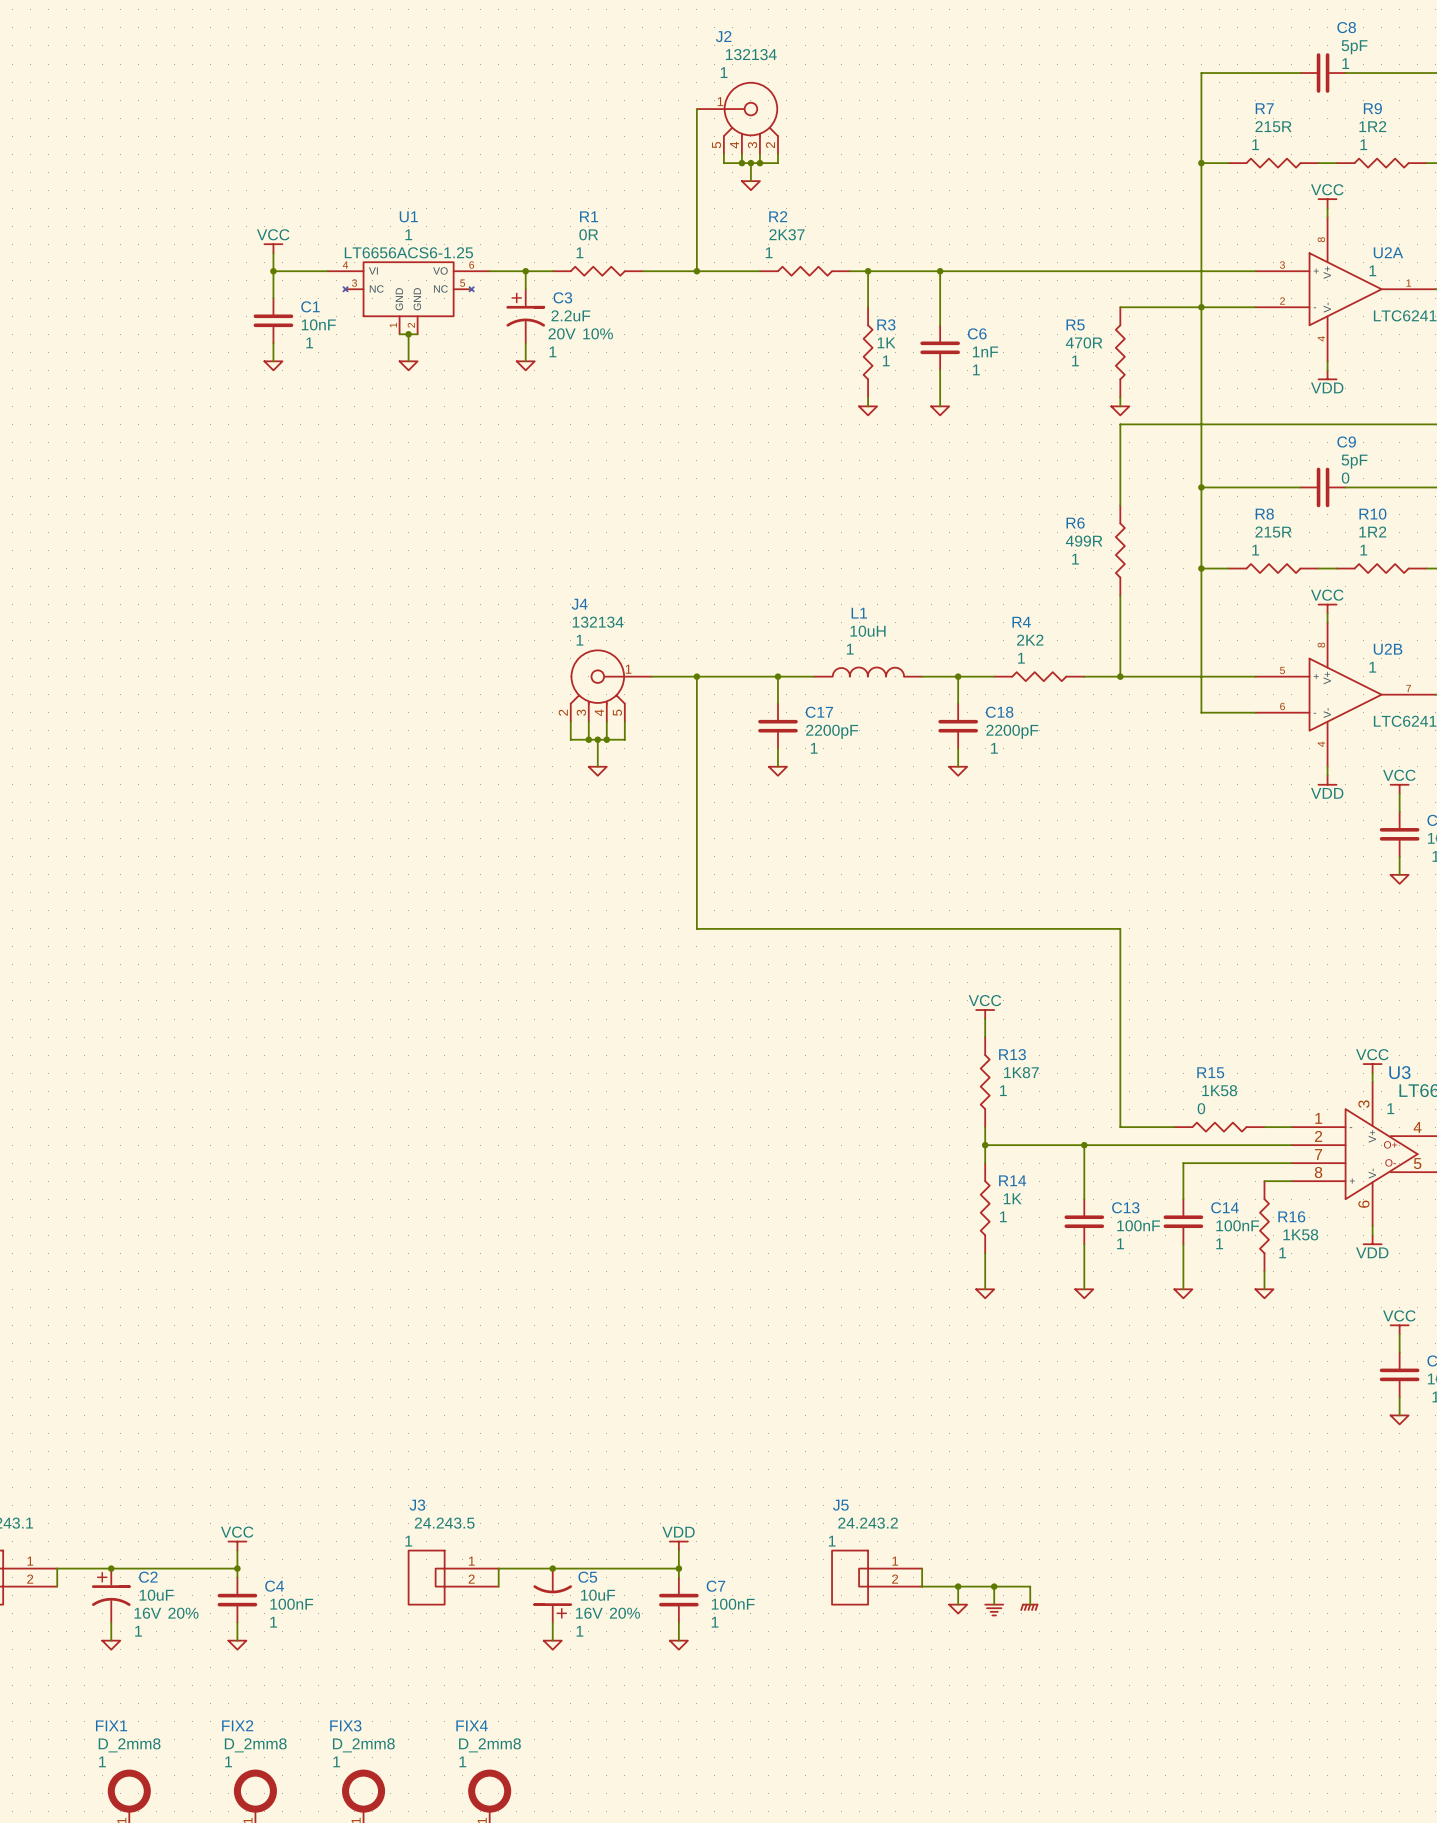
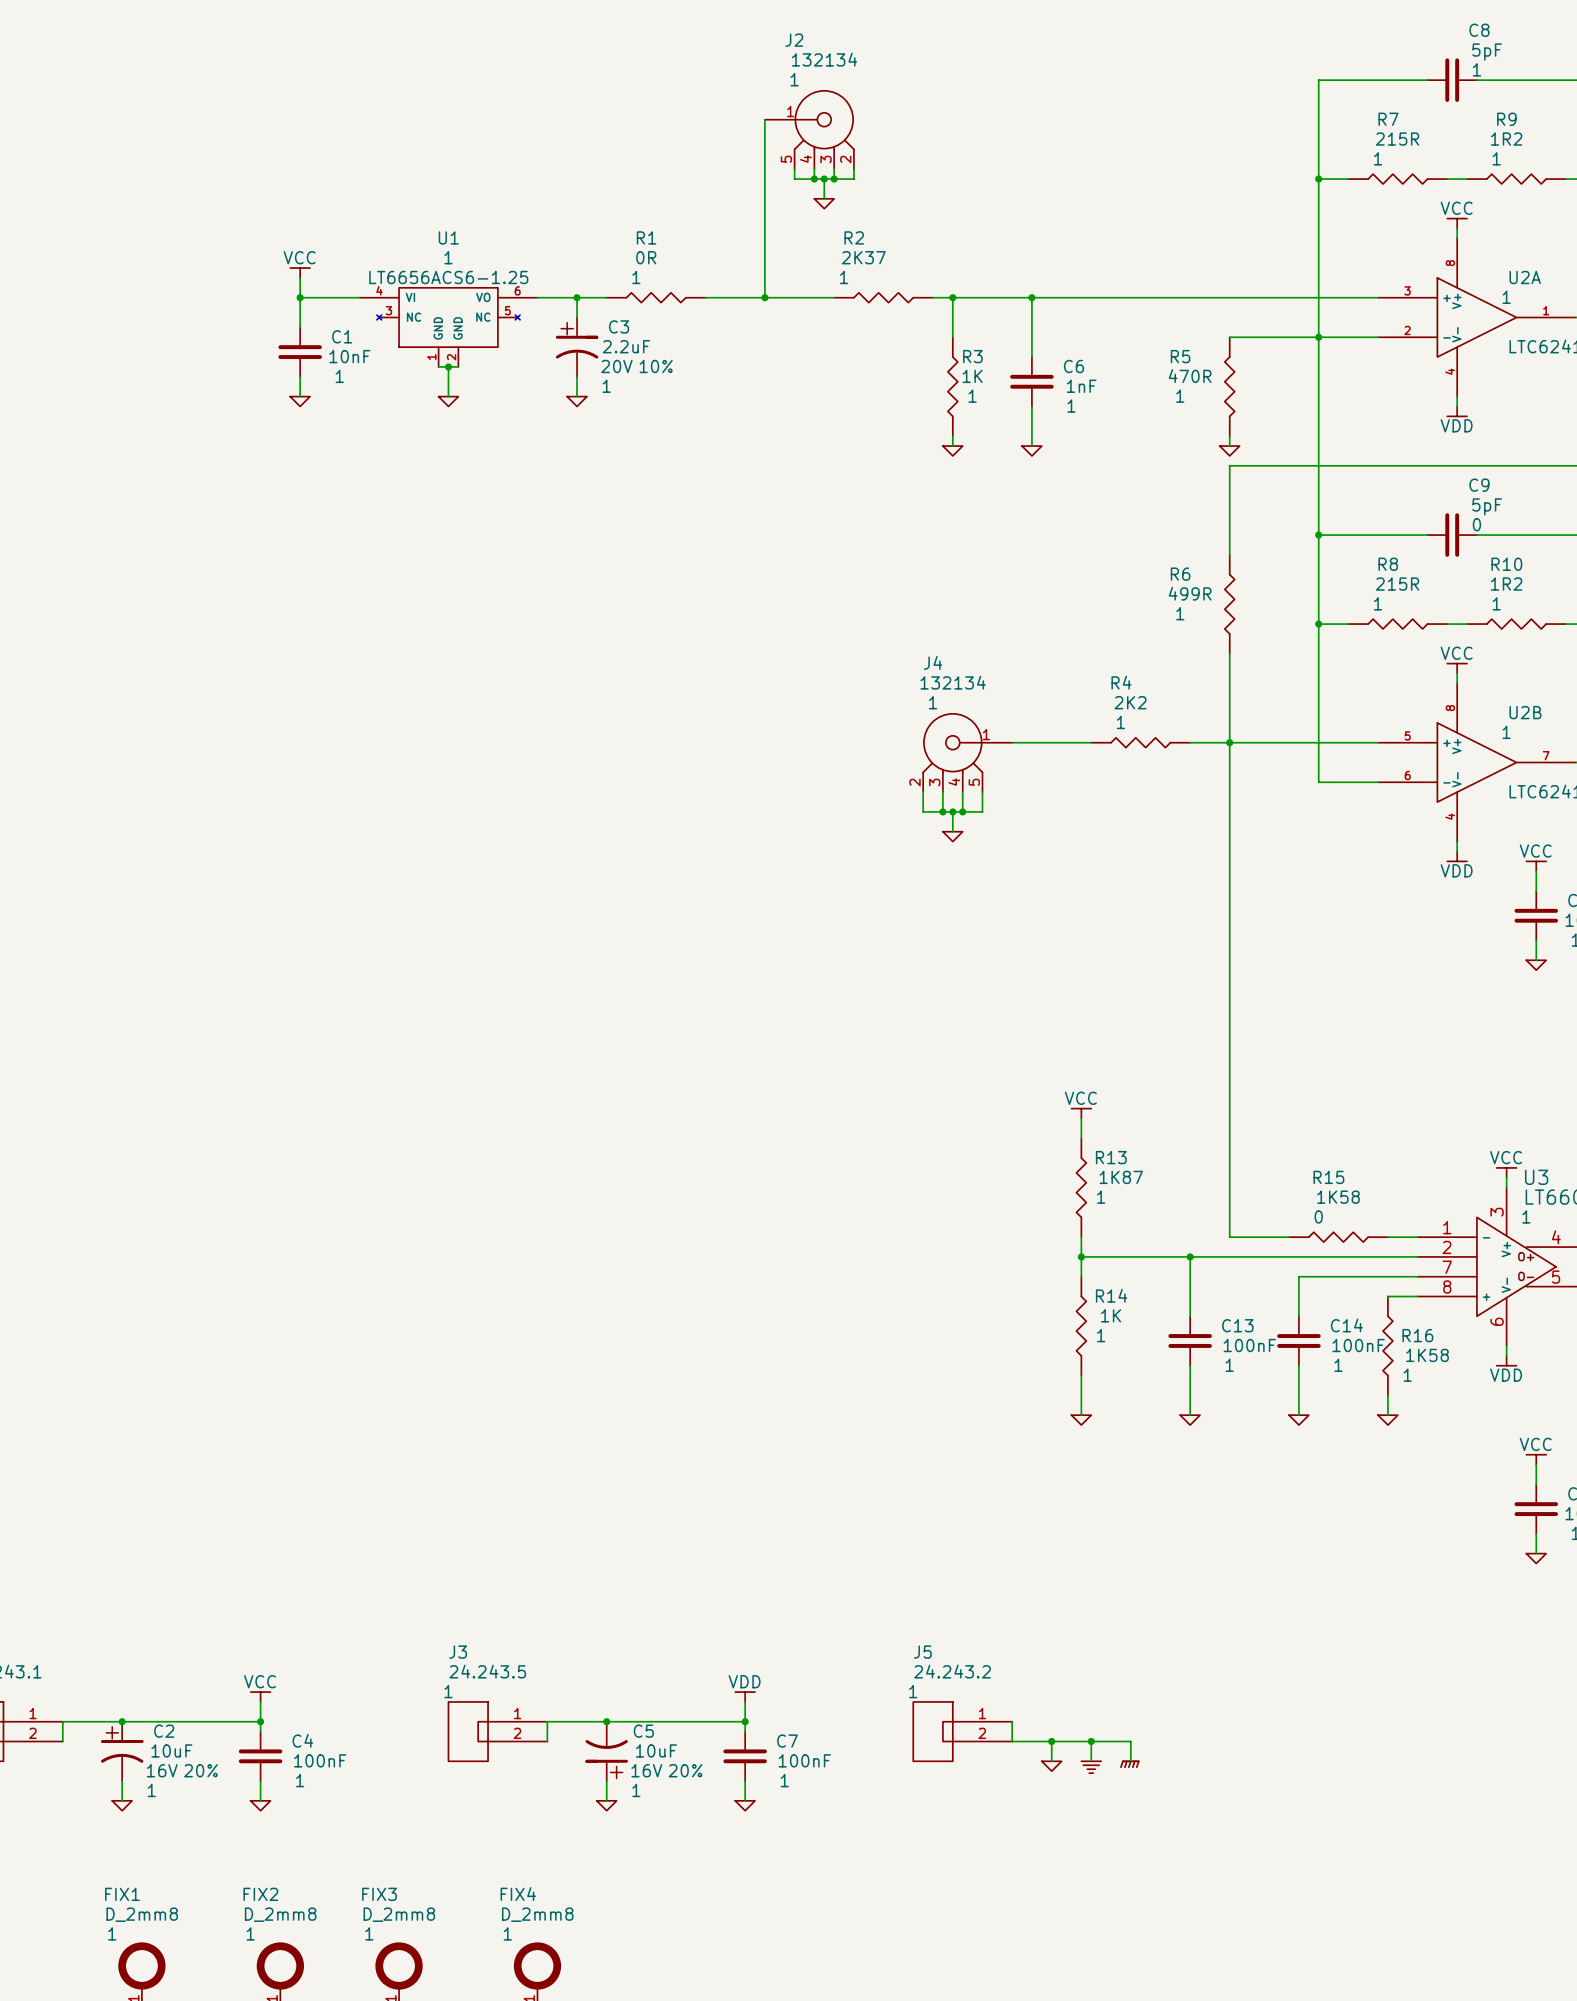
L1: (868, 672) -> none
wire: (651, 676) (814, 676) -> none
wire: (696, 676) (696, 928) (1120, 928) -> (1229, 742) (1229, 1019)
junction: (696, 676) -> none
wire: (777, 676) (777, 703) -> none
junction: (777, 676) -> none
wire: (958, 676) (958, 703) -> none
junction: (958, 676) -> none
J4 position: (611, 686) -> (967, 753)
wire: (570, 721) (570, 739) (624, 739) (624, 721) -> none
wire: (588, 721) (588, 739) -> none
wire: (606, 721) (606, 739) -> none
wire: none -> (923, 792) (923, 811) (982, 811) (982, 792)
C17: (777, 726) -> none
C18: (958, 726) -> none
junction: (588, 739) -> none
wire: (597, 739) (597, 766) -> none
junction: (597, 739) -> none
junction: (606, 739) -> none
junction: none -> (942, 811)
wire: none -> (952, 811) (952, 831)
junction: none -> (952, 811)
junction: none -> (962, 811)
wire: (777, 748) (777, 766) -> (942, 792) (942, 811)
wire: (958, 748) (958, 766) -> (962, 792) (962, 811)
power symbol: none -> (952, 836)
power symbol: (597, 771) -> none
power symbol: (777, 771) -> none
power symbol: (958, 771) -> none

